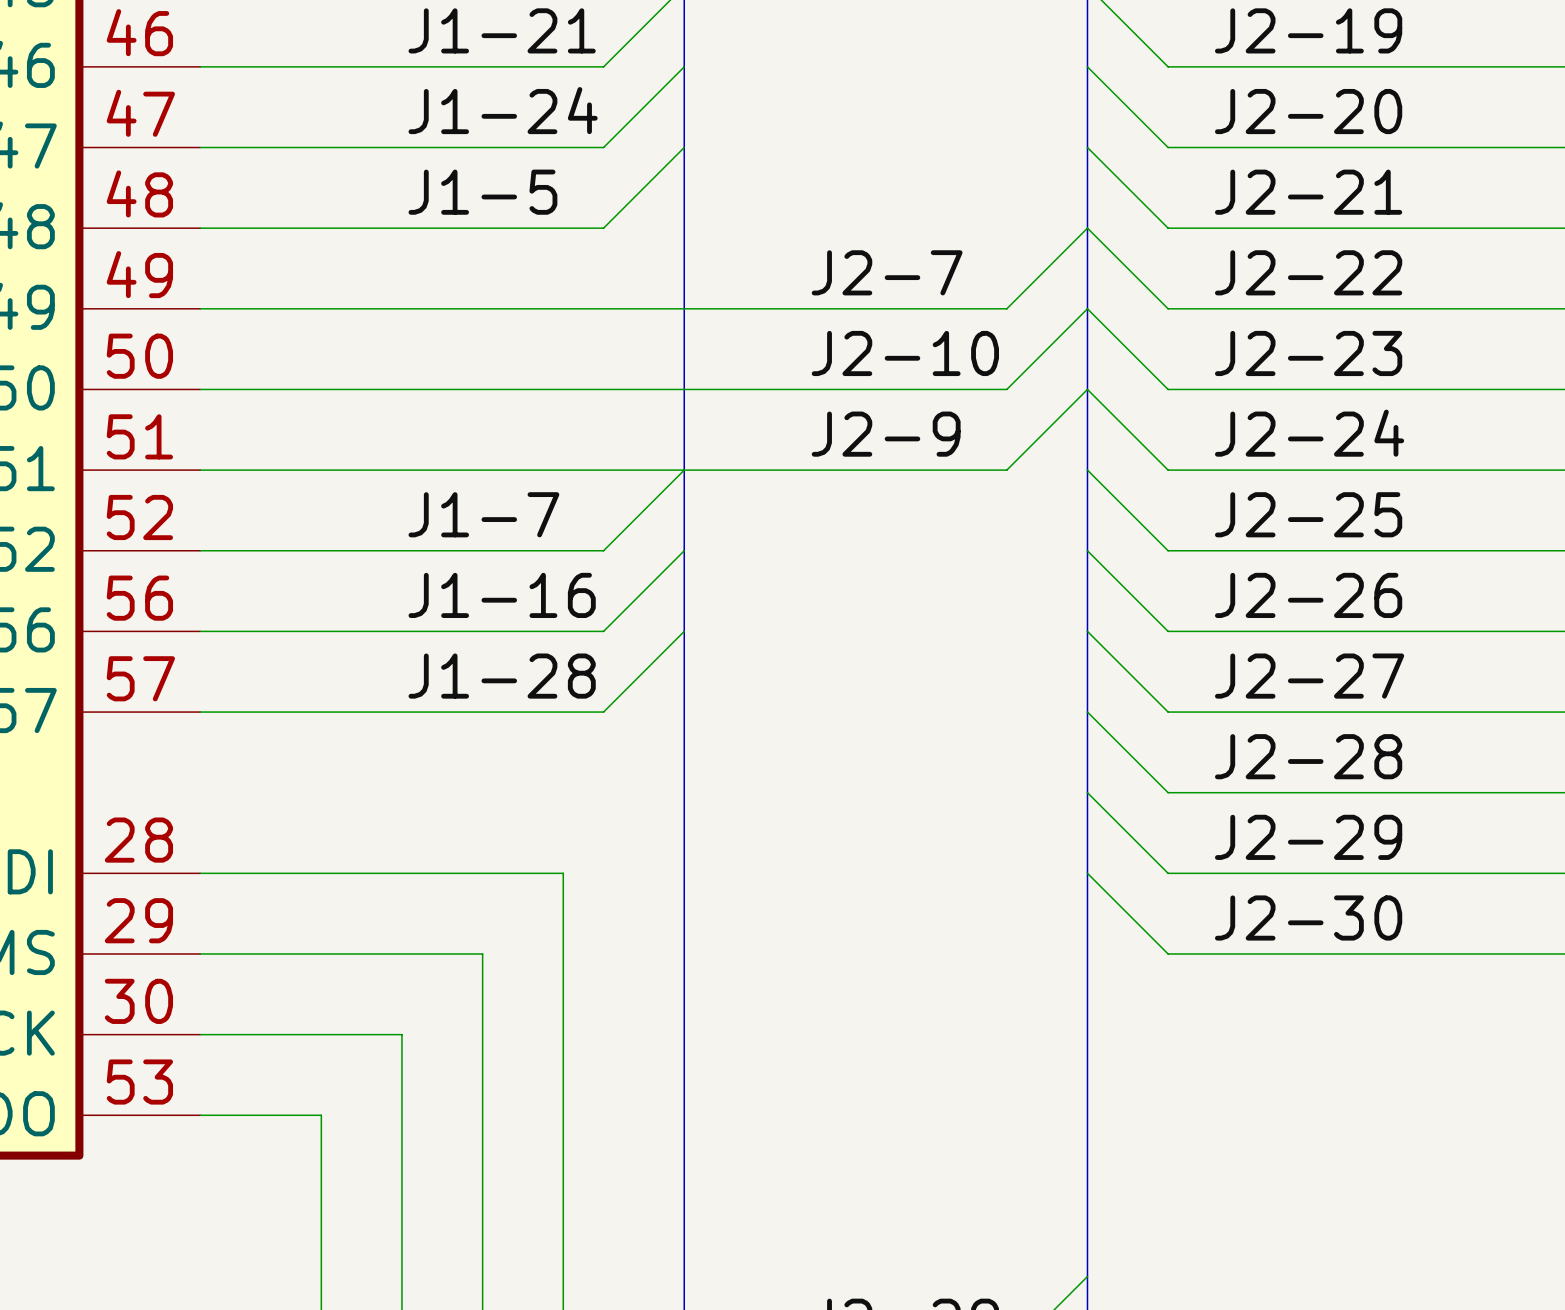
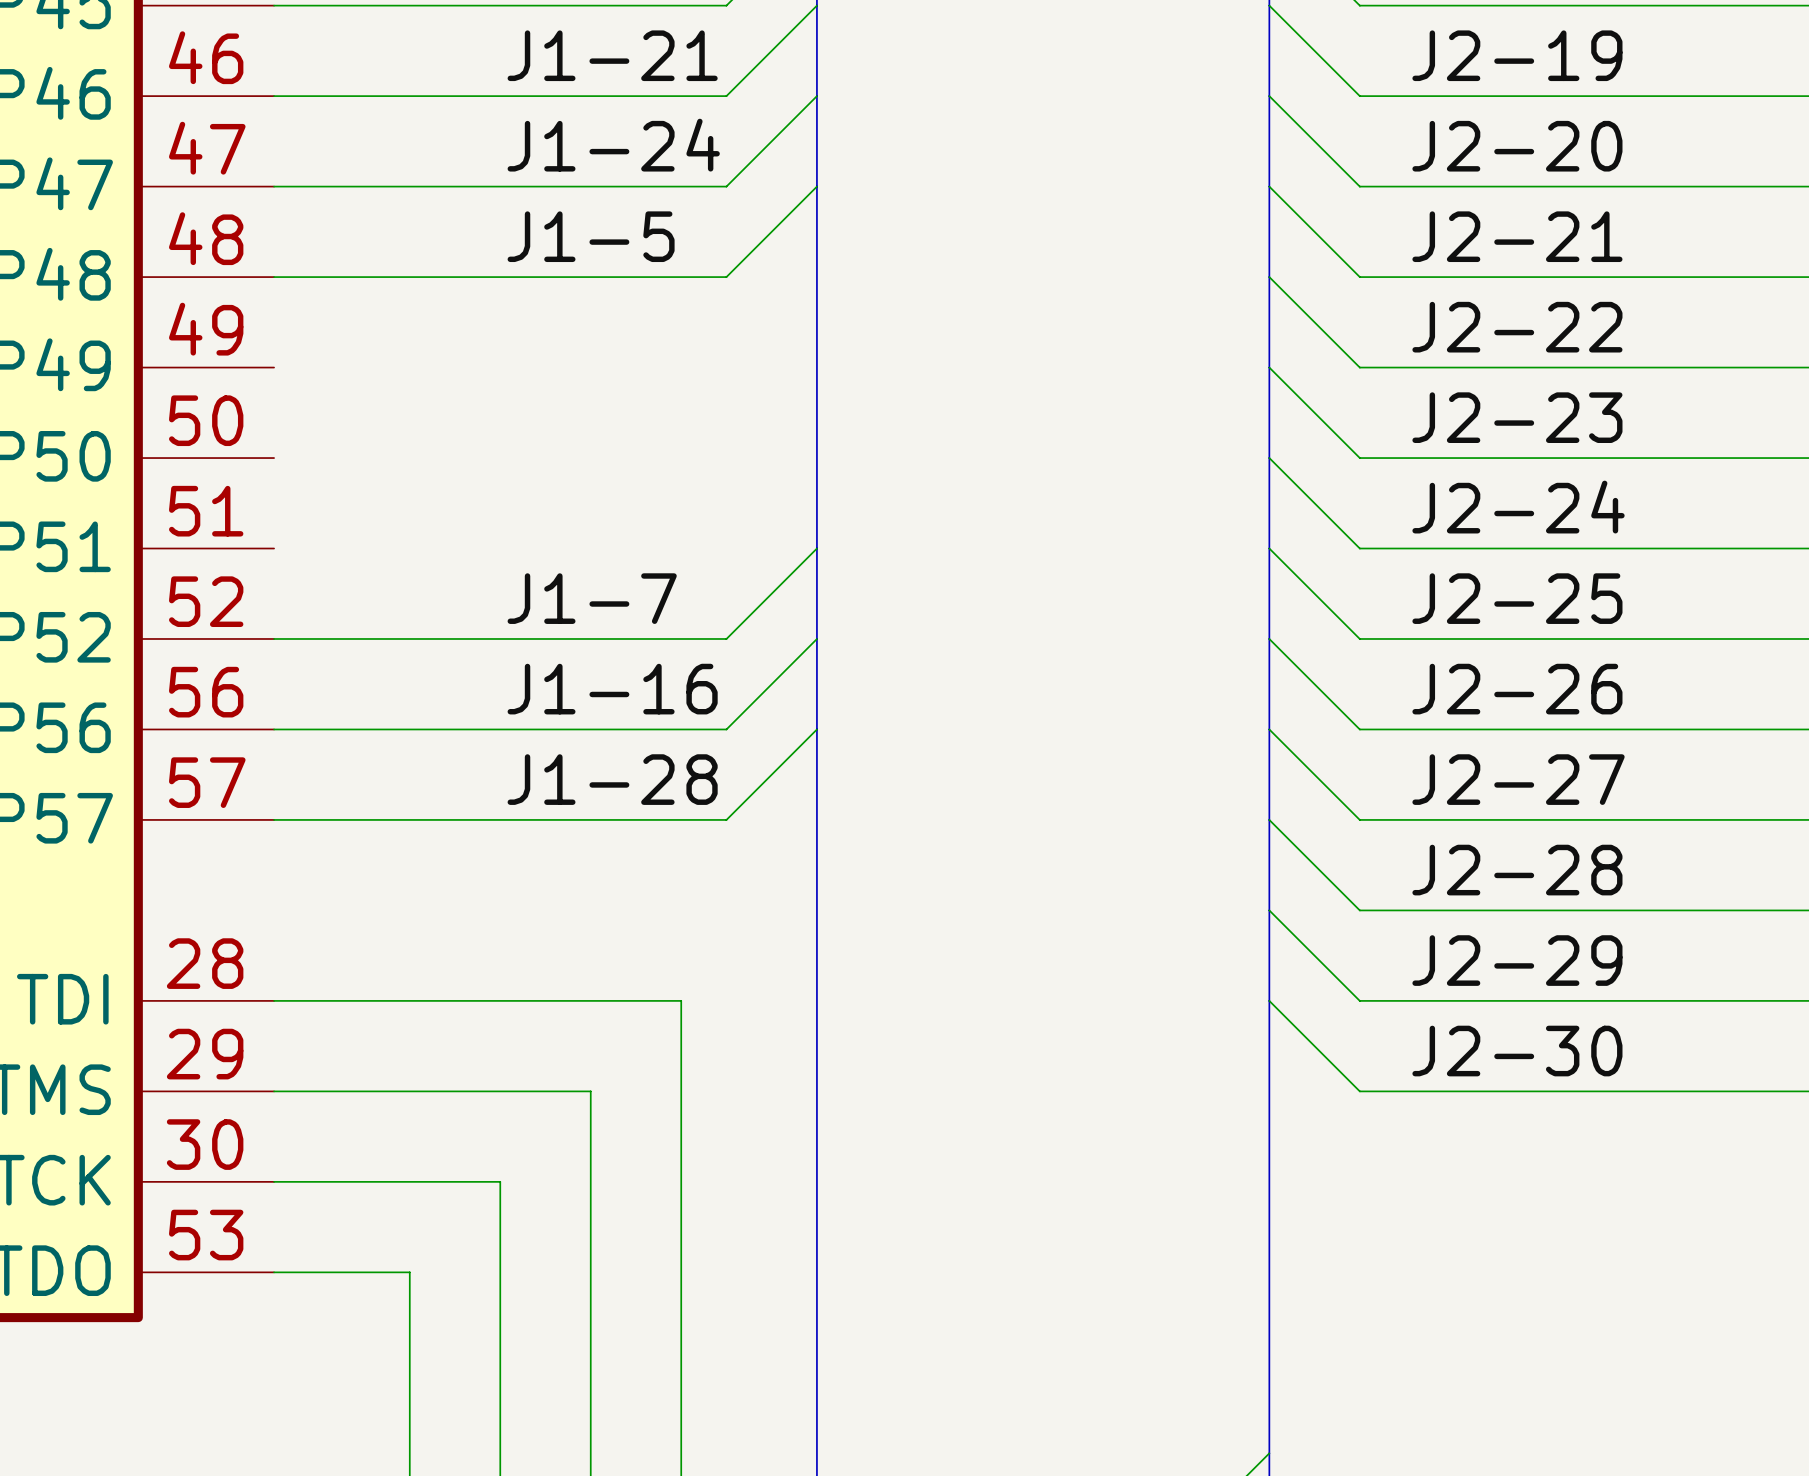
wire: (1087, 228) (1006, 308) (200, 308) -> none
label: J2-7 (887, 272) -> none
wire: (1087, 308) (1006, 389) (200, 389) -> none
label: J2-10 (905, 353) -> none
wire: (1087, 389) (1006, 470) (200, 470) -> none
label: J2-9 (886, 434) -> none

